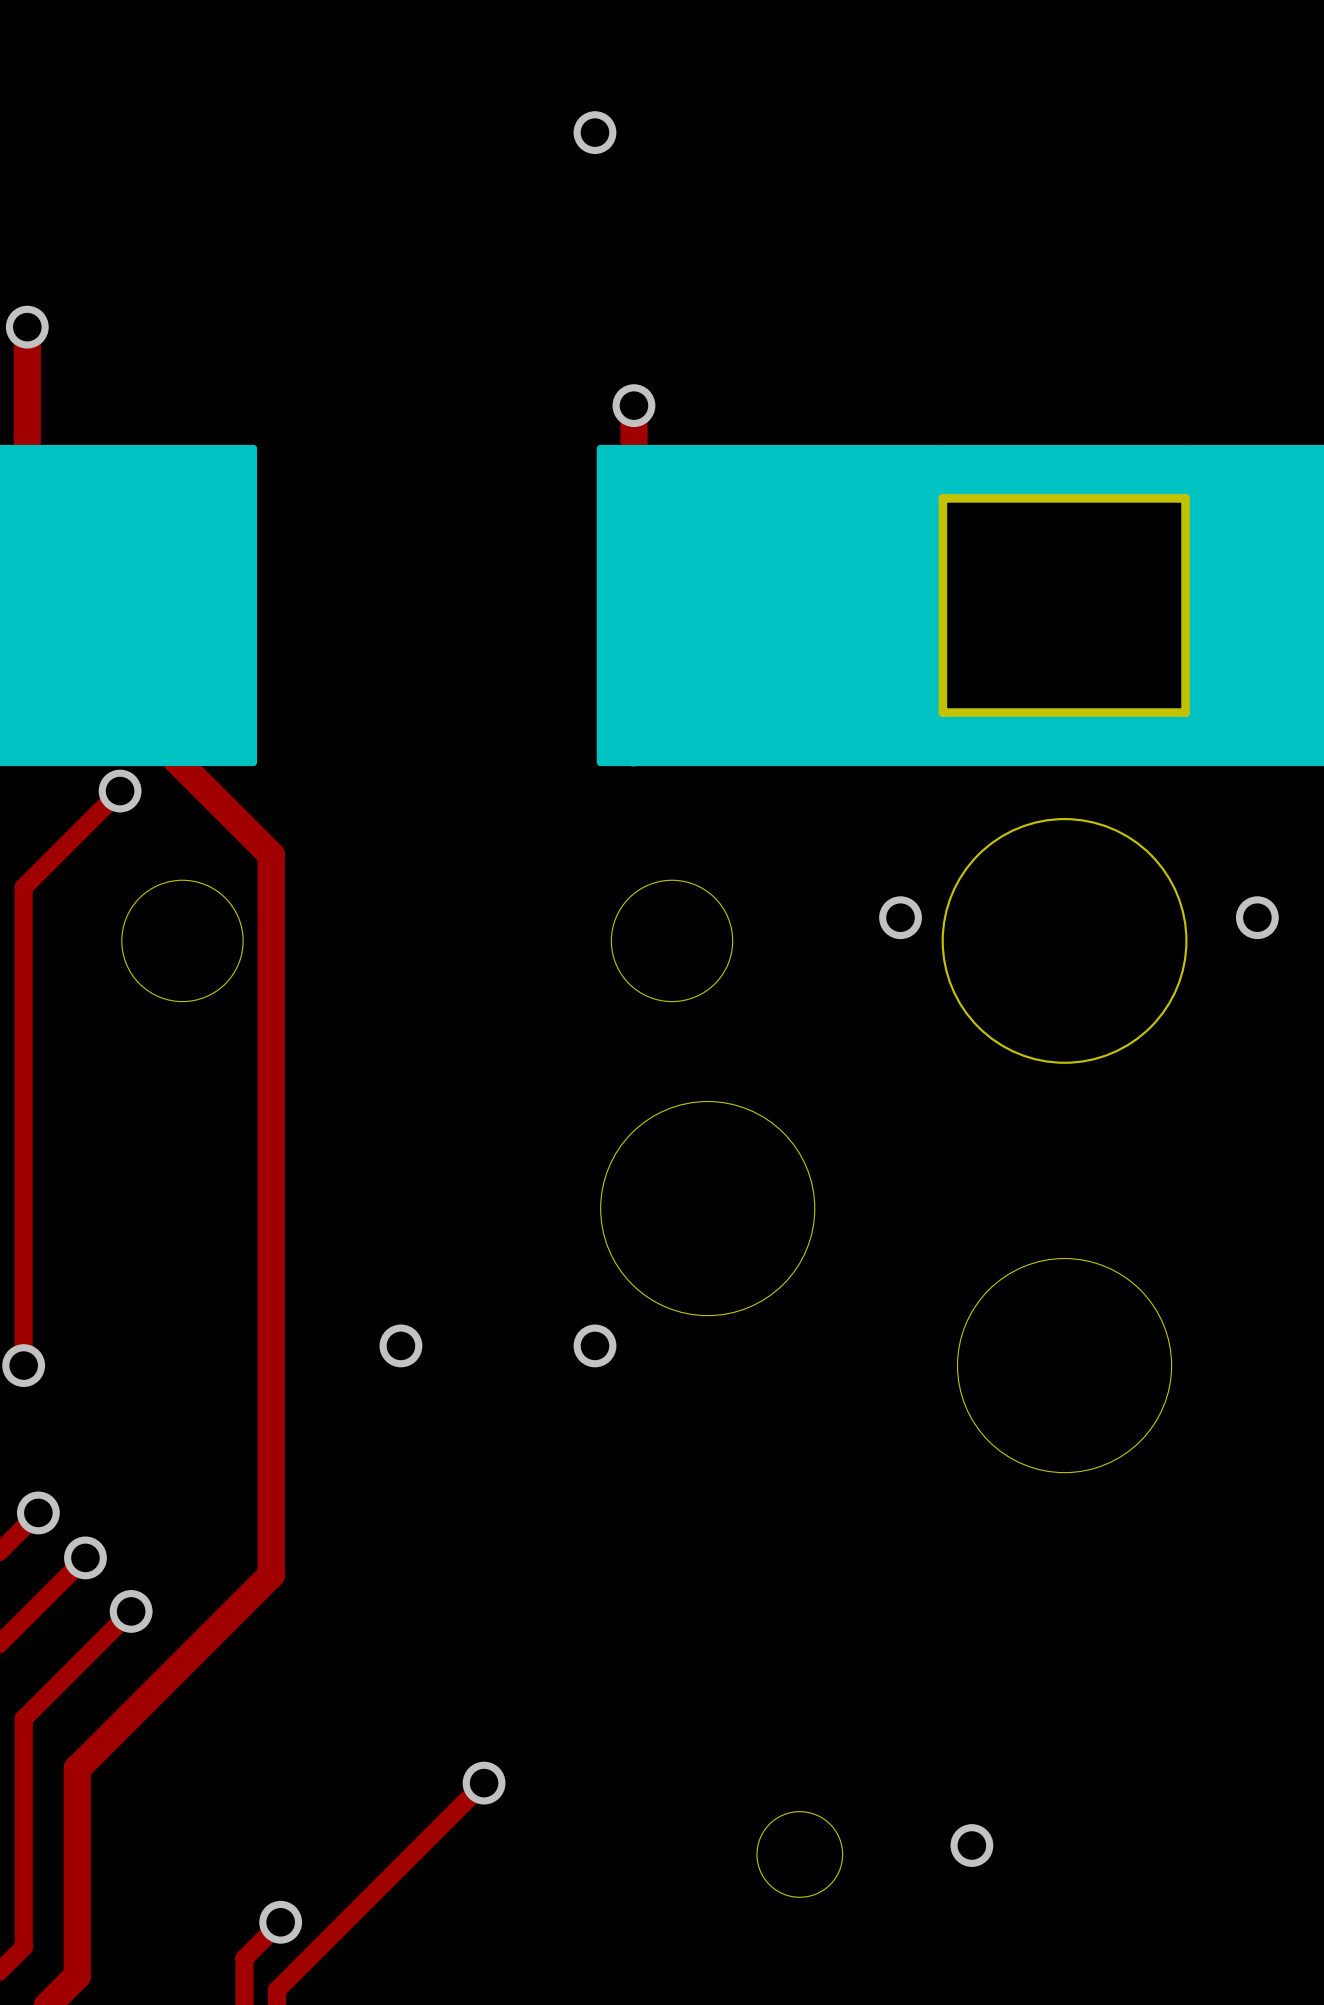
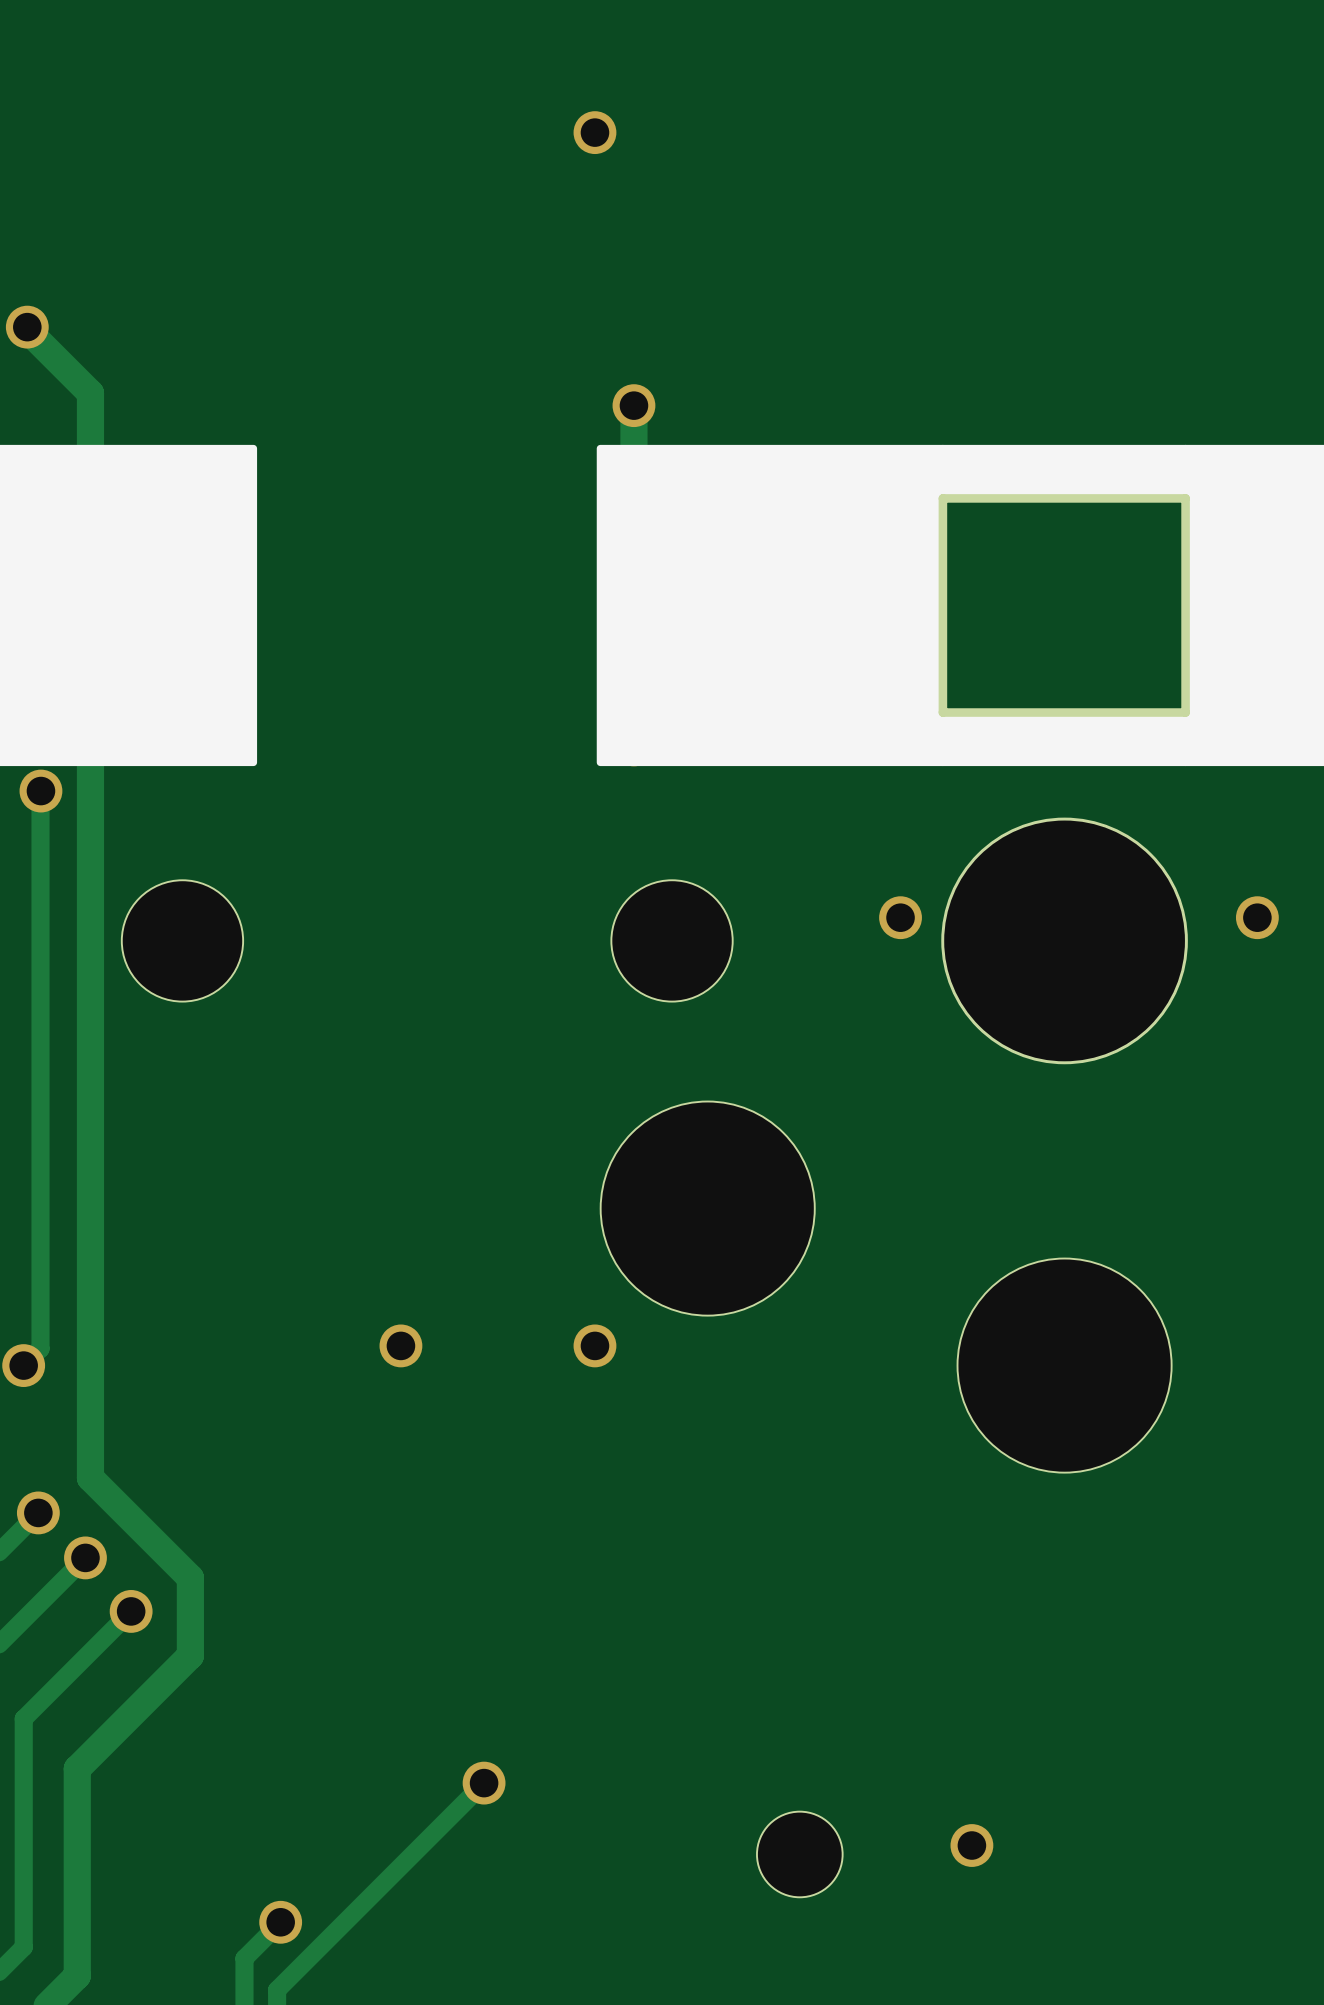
track: (27, 329) (27, 610) (271, 854) (271, 1574) (190, 1655) -> (27, 329) (90, 393) (90, 1477) (190, 1577) (190, 1655)
track: (120, 791) (23, 887) (23, 1365) -> (40, 791) (40, 1348) (23, 1365)
via position: (120, 791) -> (40, 791)

